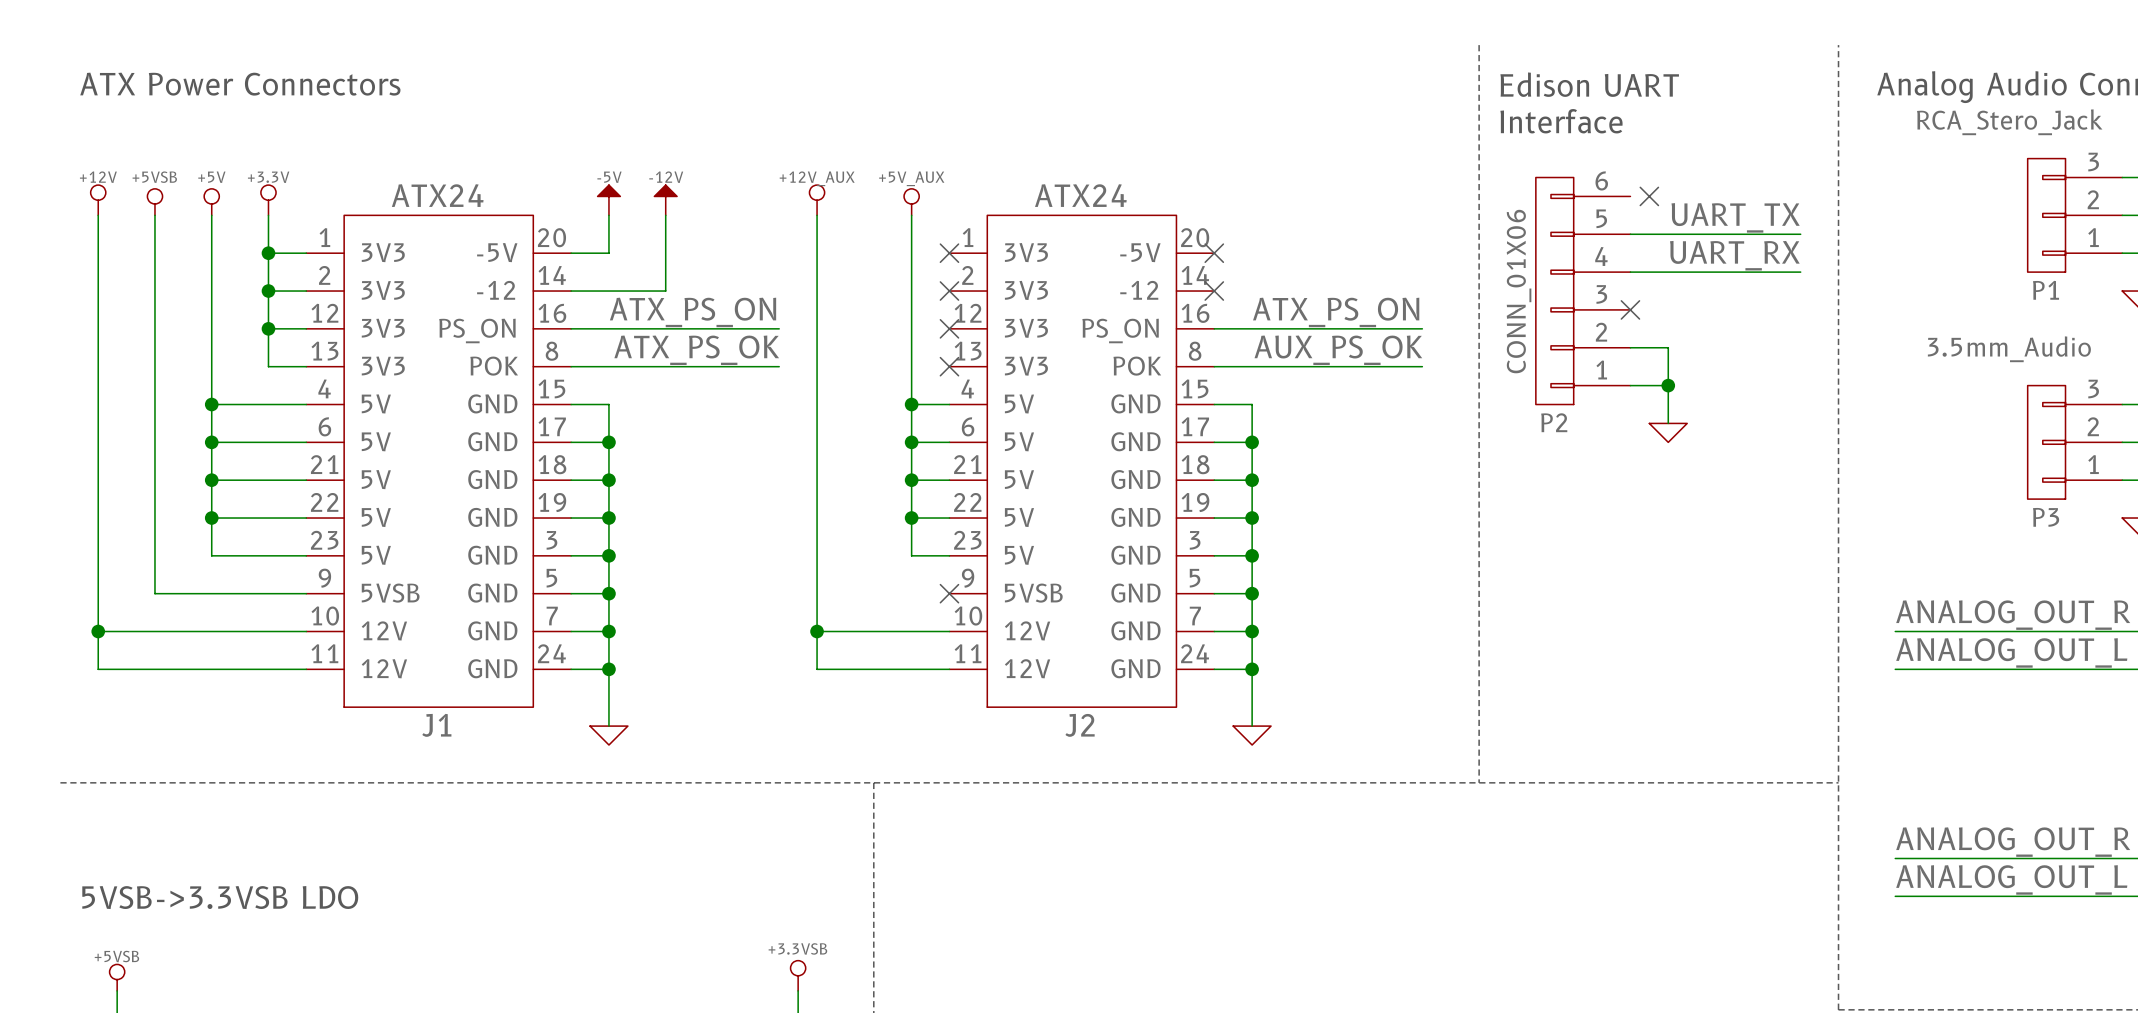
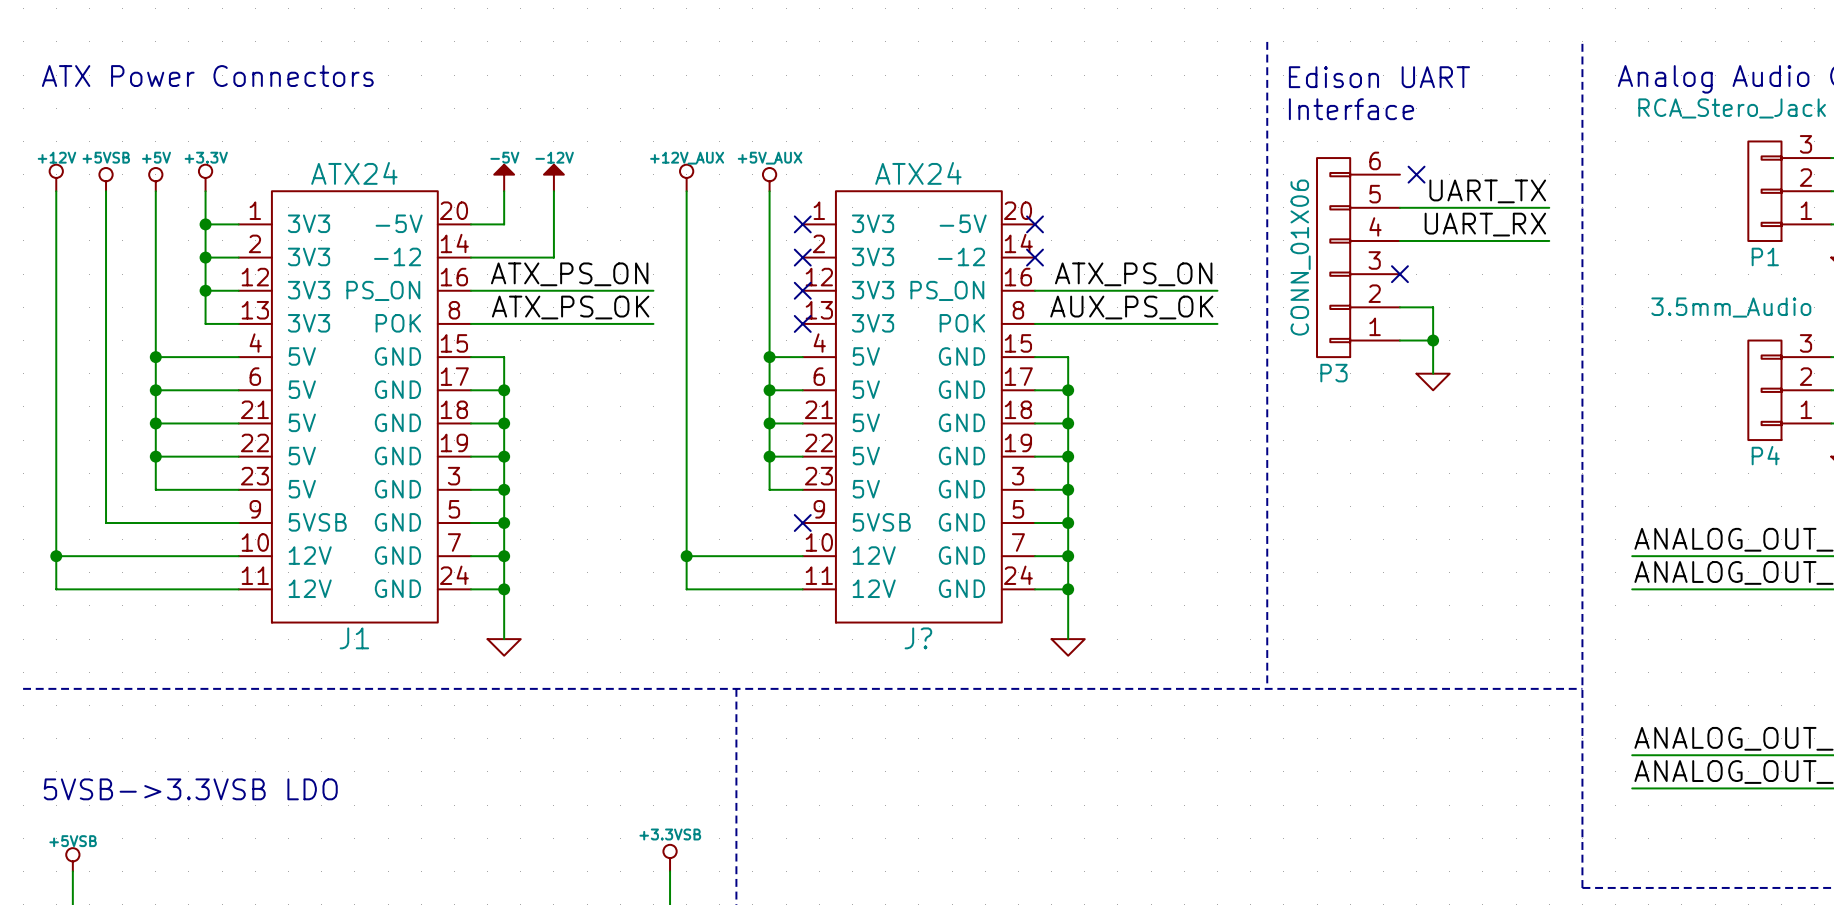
P2 name: P2 (1554, 422) -> P3 (1333, 373)
P3 name: P3 (2046, 517) -> P4 (1765, 455)
J2 name: J2 (1080, 725) -> J? (918, 638)

